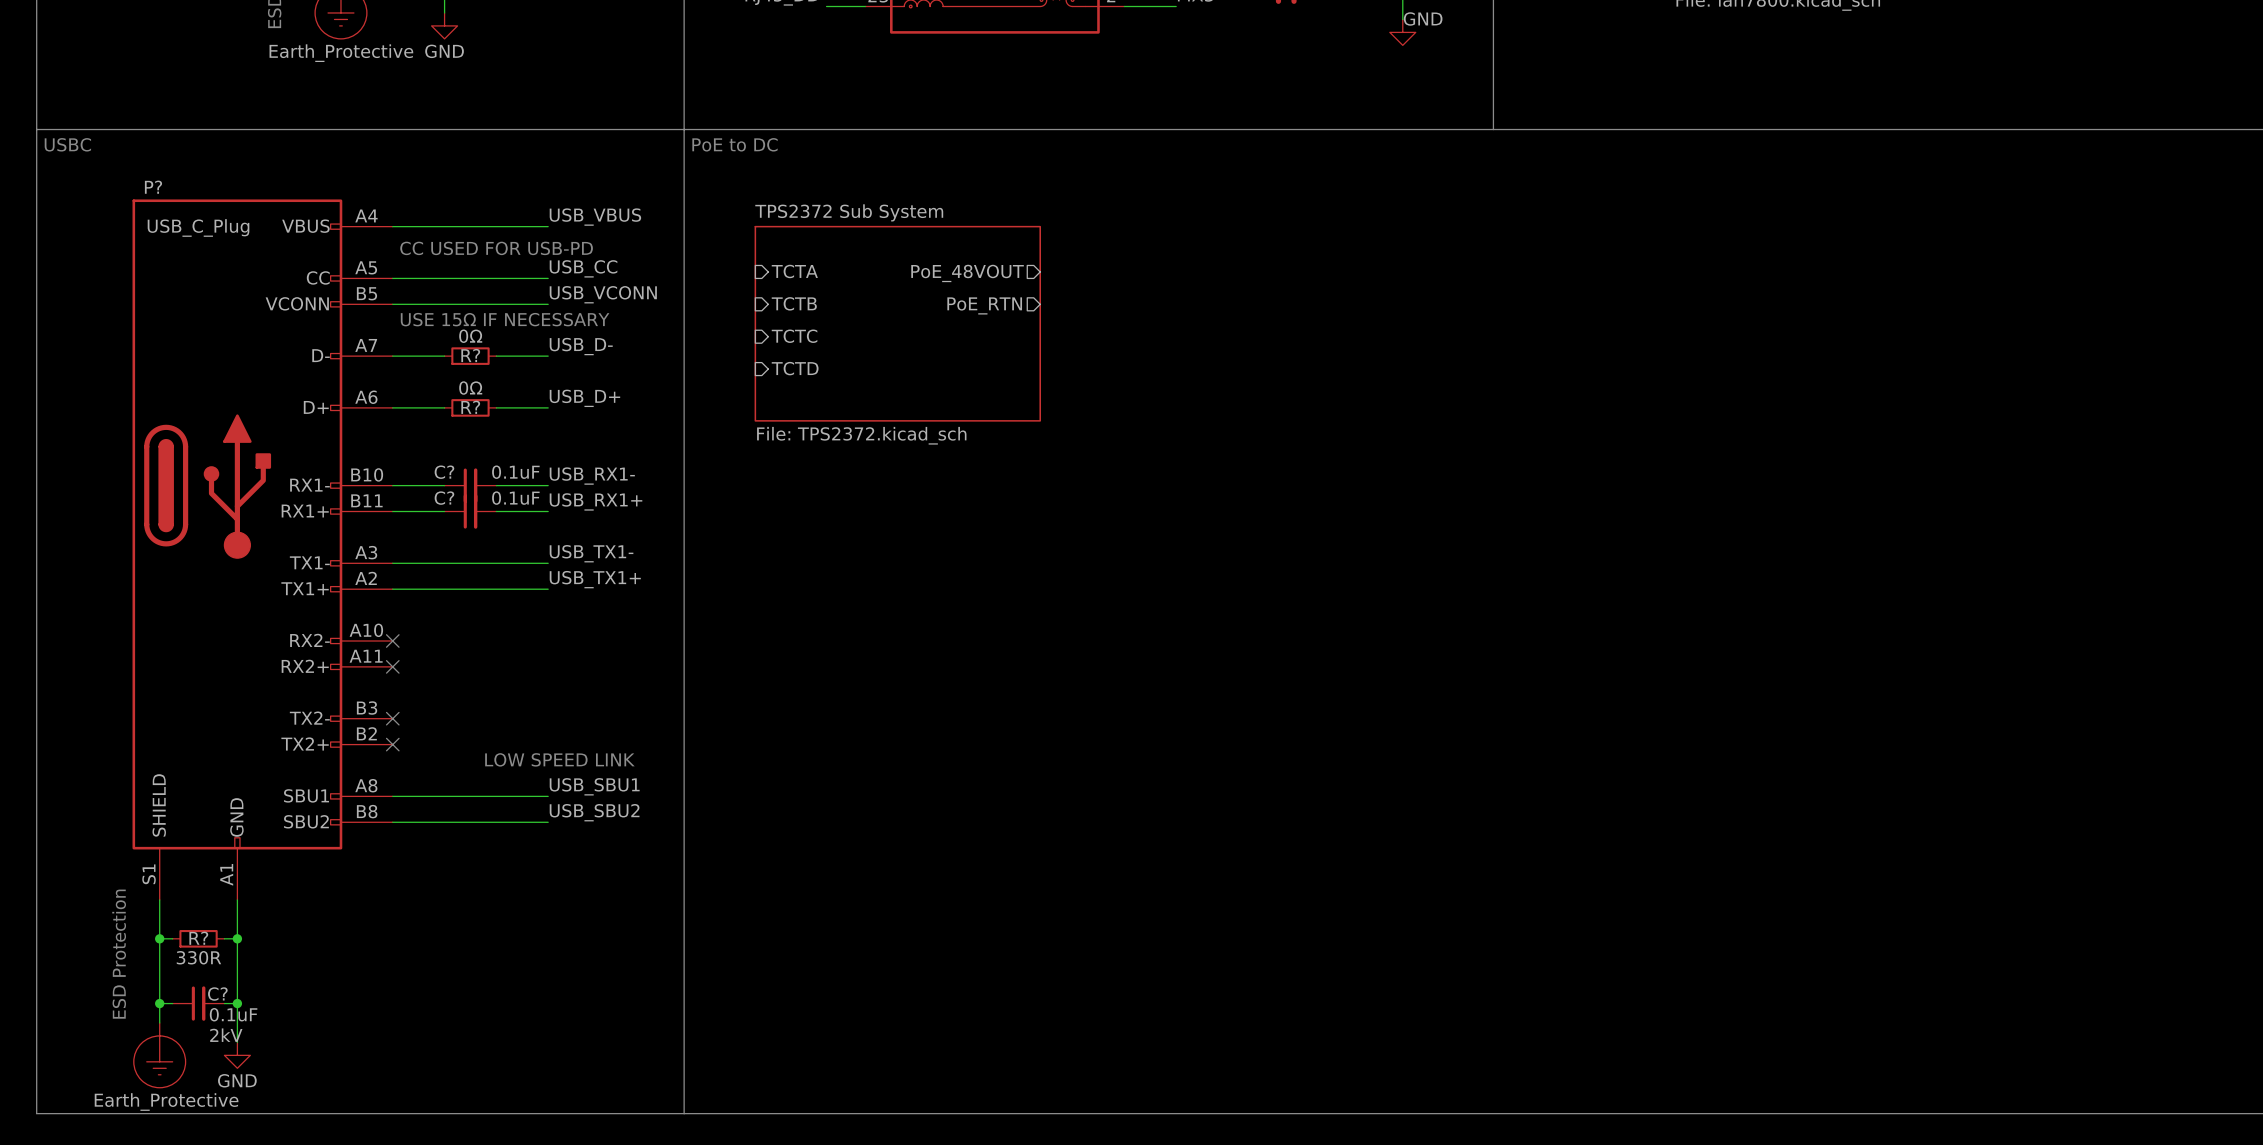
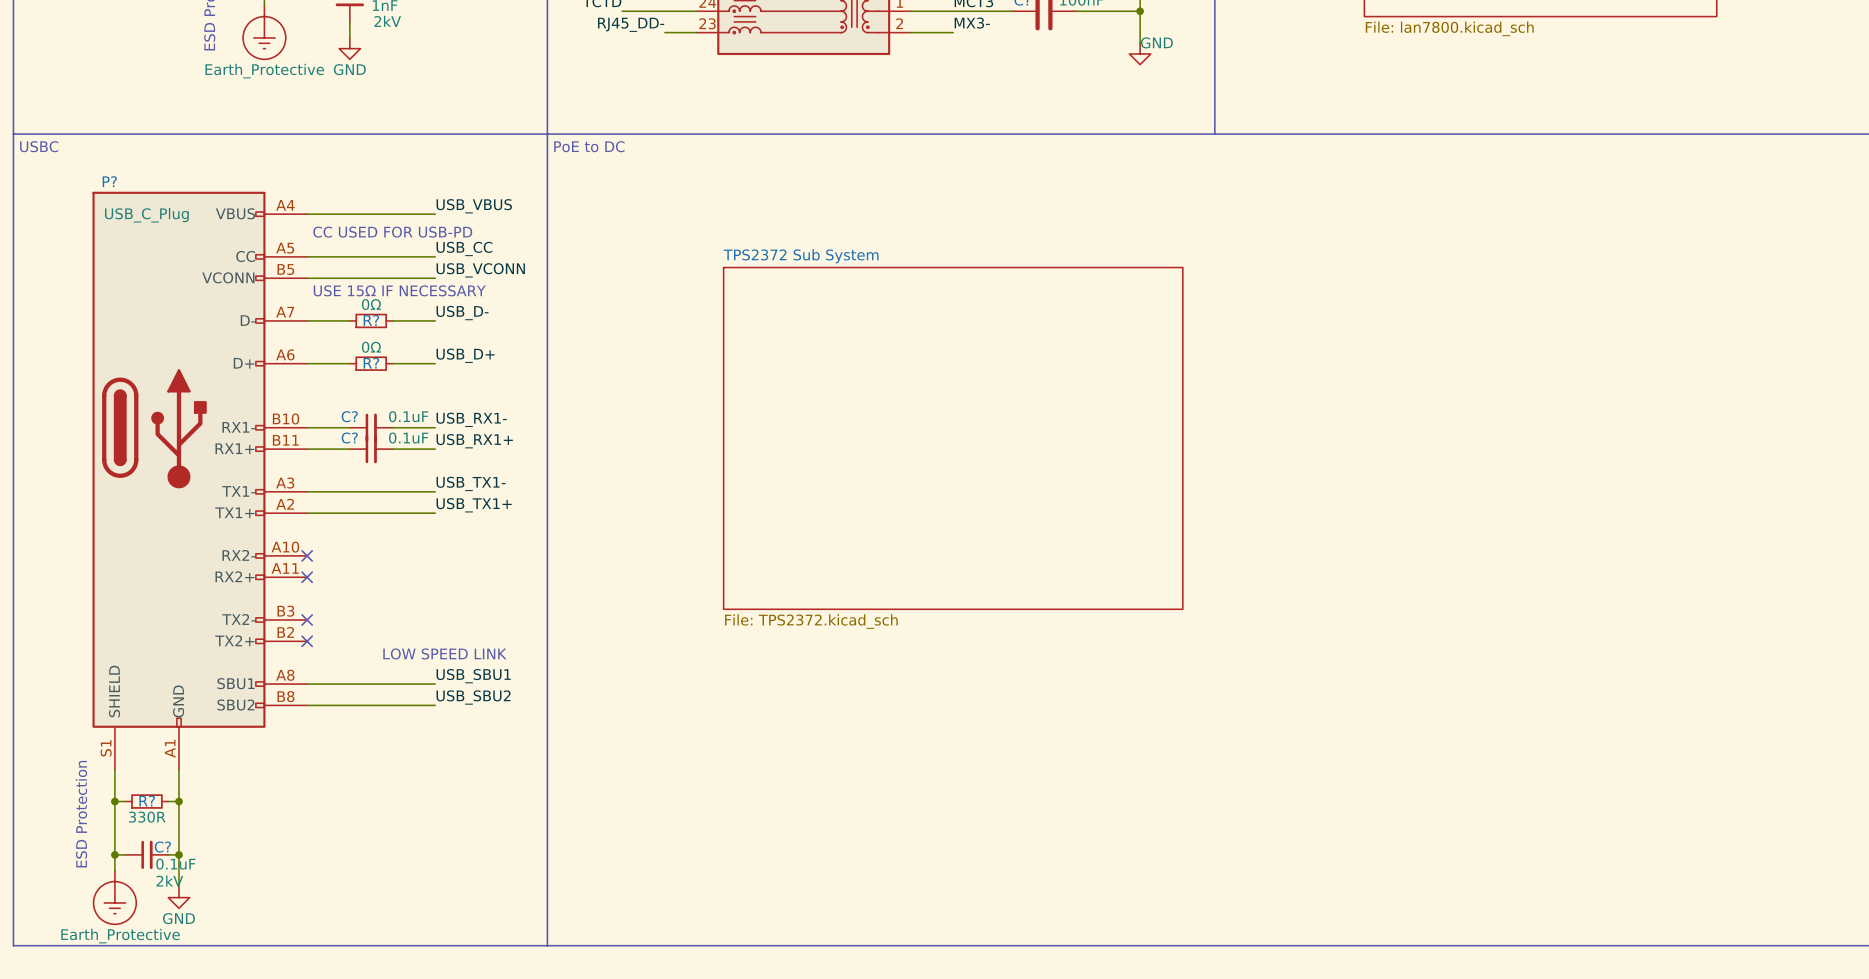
sheet TPS2372 Sub System name position: TPS2372 Sub System (849, 212) -> TPS2372 Sub System (801, 256)
sheet TPS2372 Sub System shape: [754, 225, 1041, 422] -> [722, 266, 1184, 610]
sheet pin: TCTA (794, 271) -> none
sheet pin: PoE_48VOUT (967, 273) -> none
sheet pin: TCTB (794, 303) -> none
sheet pin: PoE_RTN (984, 305) -> none
sheet pin: TCTC (794, 336) -> none
sheet pin: TCTD (795, 368) -> none
sheet TPS2372 Sub System value position: File: TPS2372.kicad_sch (861, 435) -> File: TPS2372.kicad_sch (811, 621)

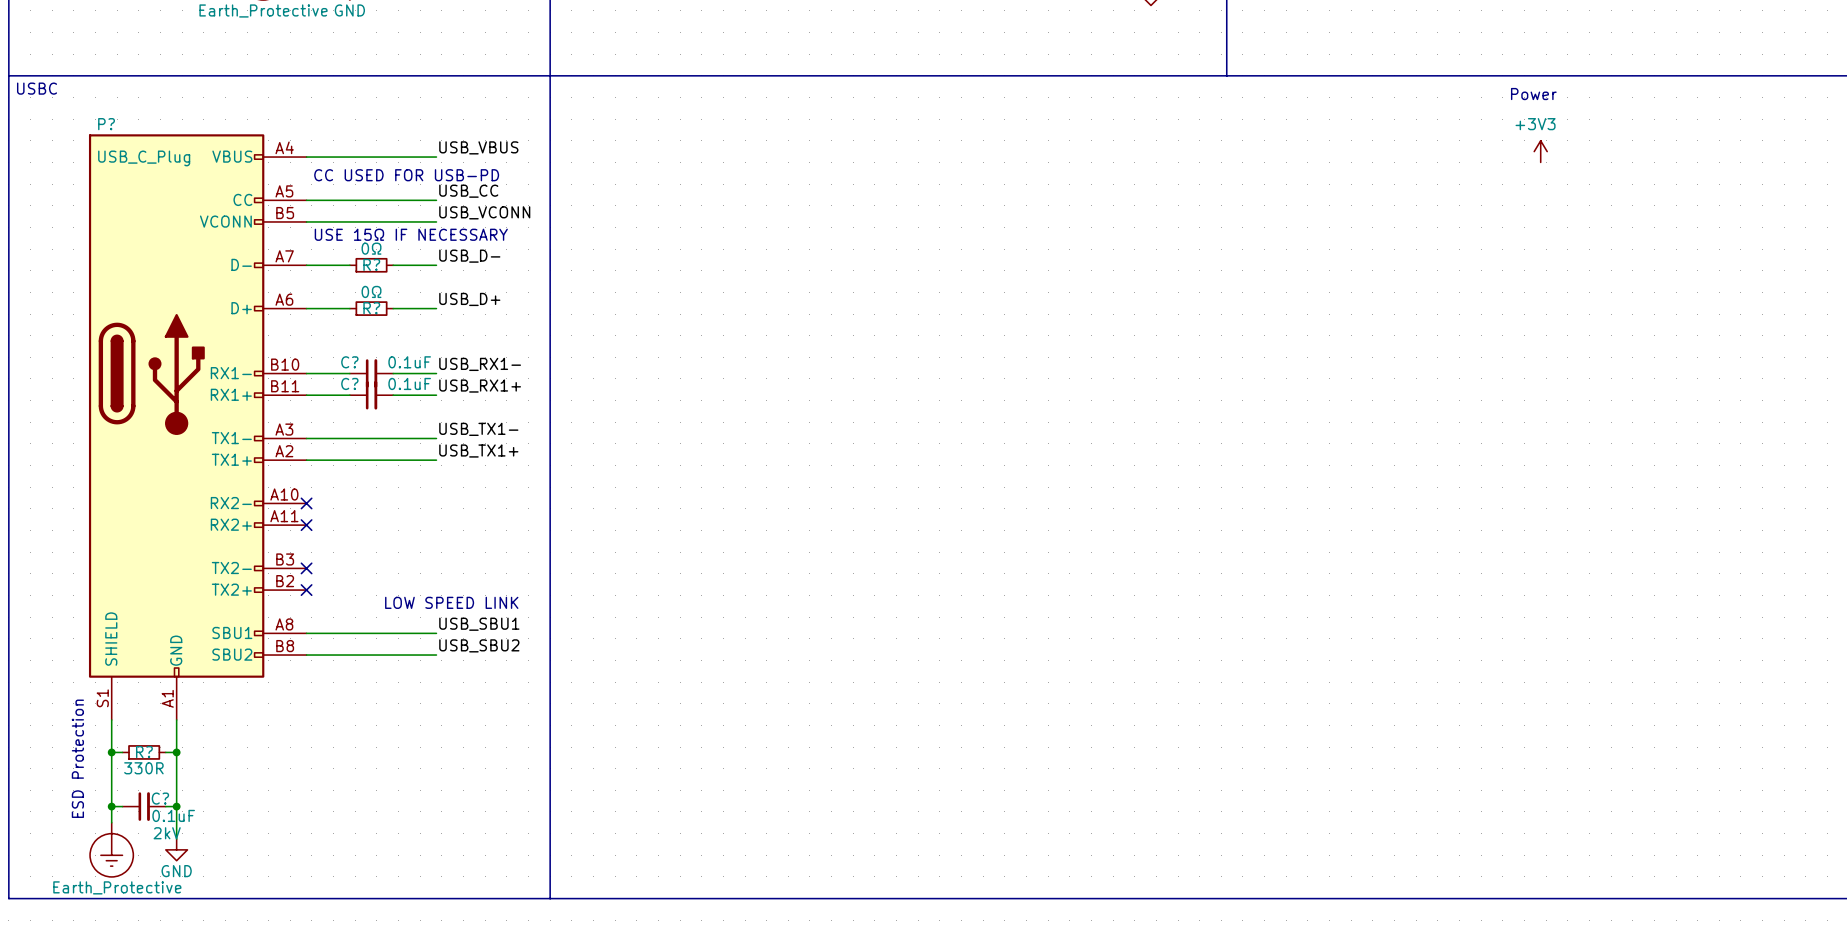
text: PoE to DC (589, 146) -> none
text: none -> Power (1533, 94)
power symbol: none -> +3V3 (1540, 151)
sheet TPS2372 Sub System: File: TPS2372.kicad_sch (953, 438) -> none

